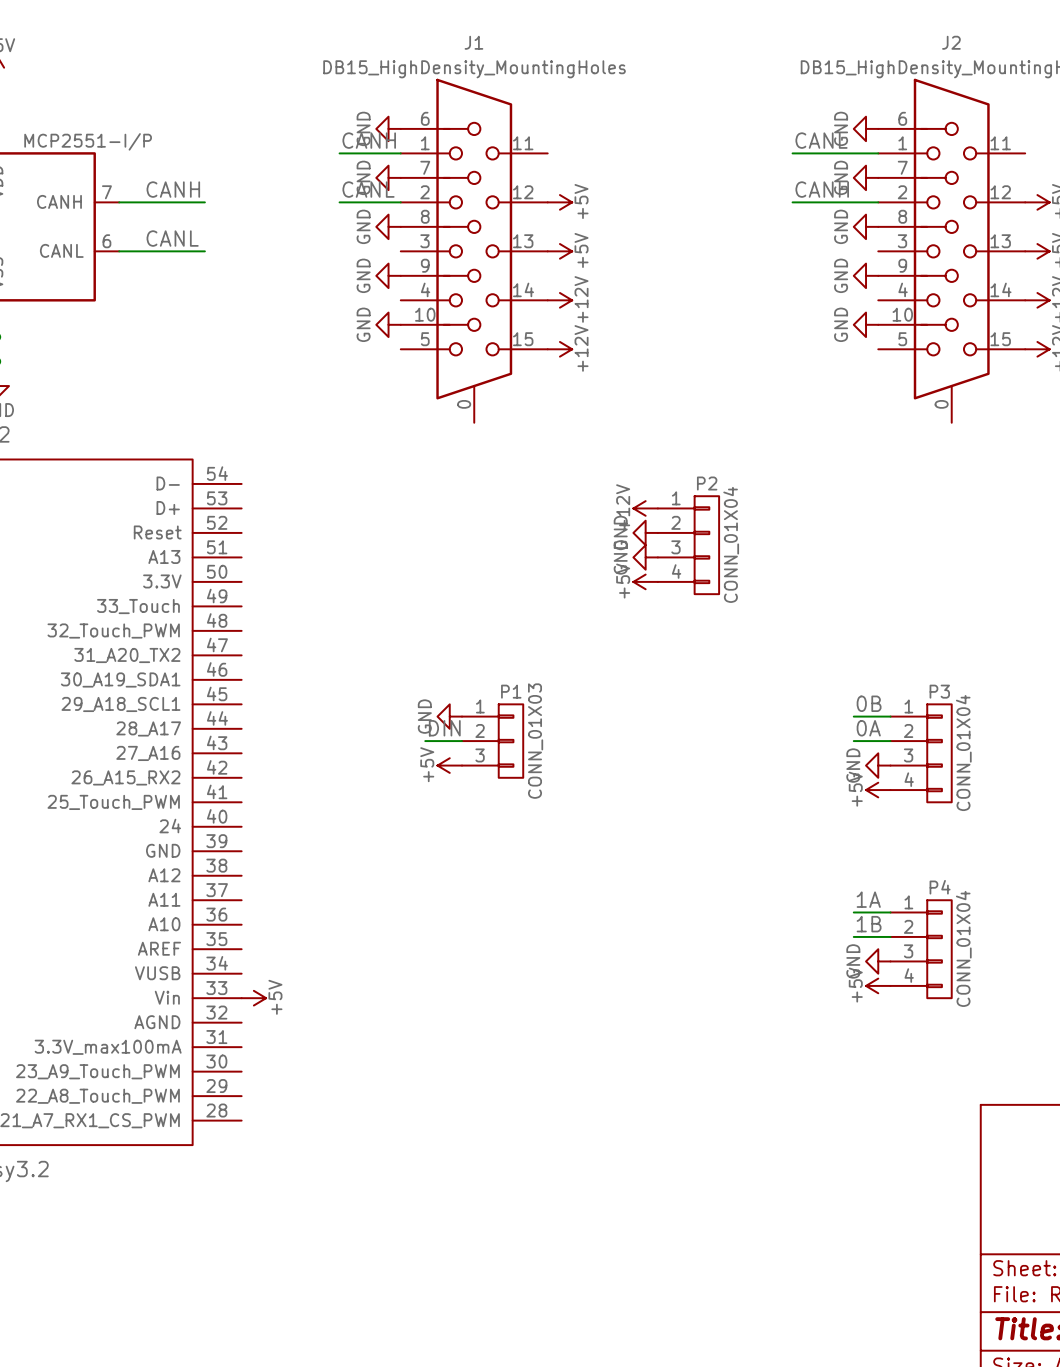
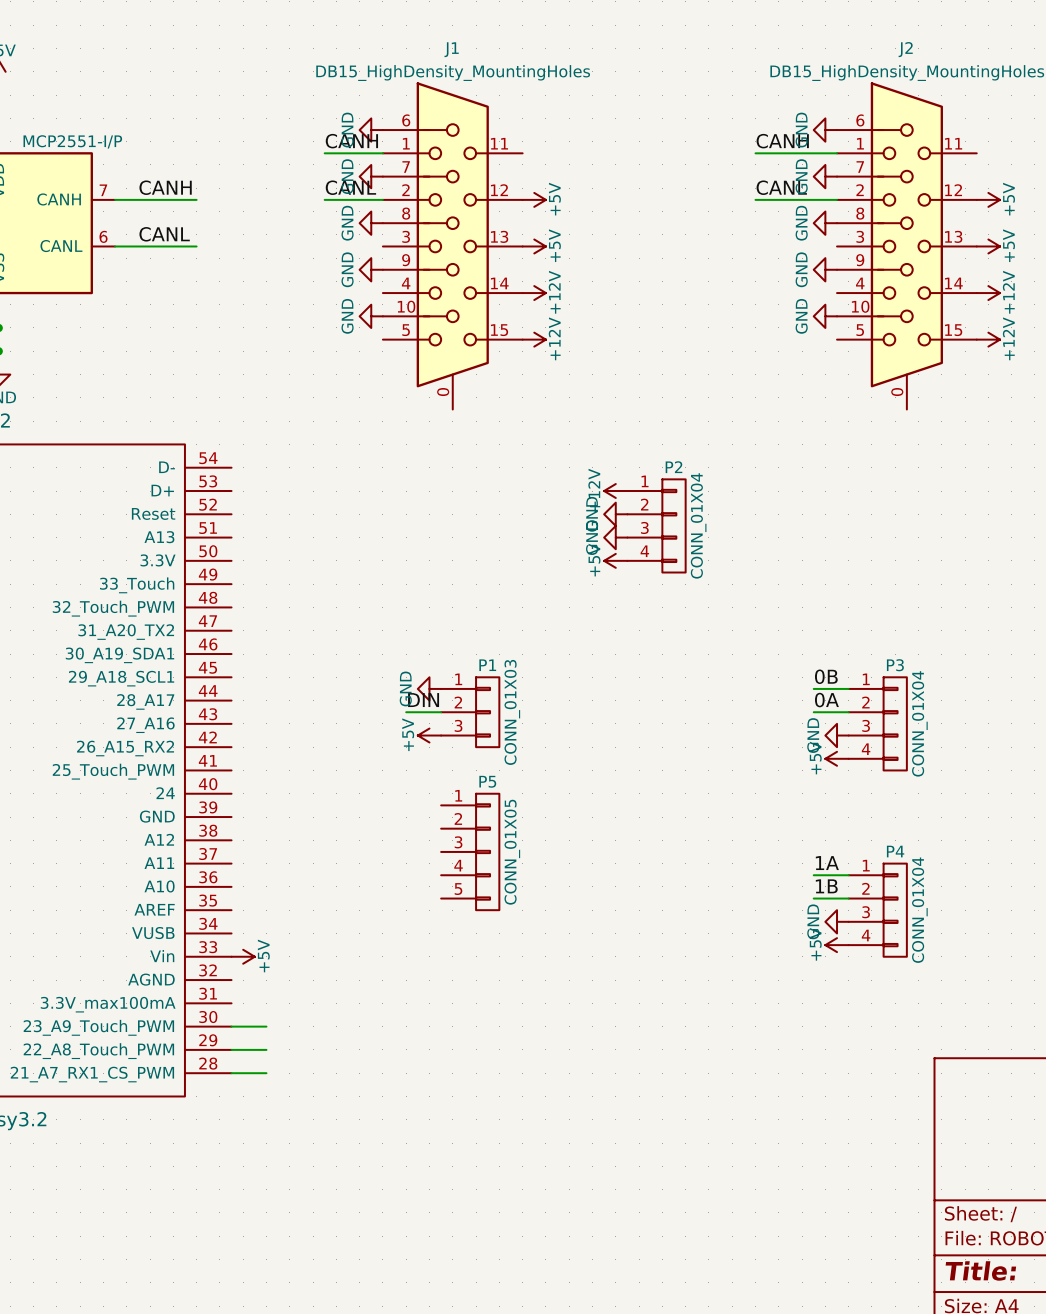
label: CANL (821, 140) -> CANH (782, 141)
label: CANH (822, 189) -> CANL (781, 187)
P5: none -> CONN_01X05 (470, 851)
wire: none -> (231, 1026) (266, 1026)
wire: none -> (231, 1049) (266, 1049)
wire: none -> (231, 1073) (266, 1073)

